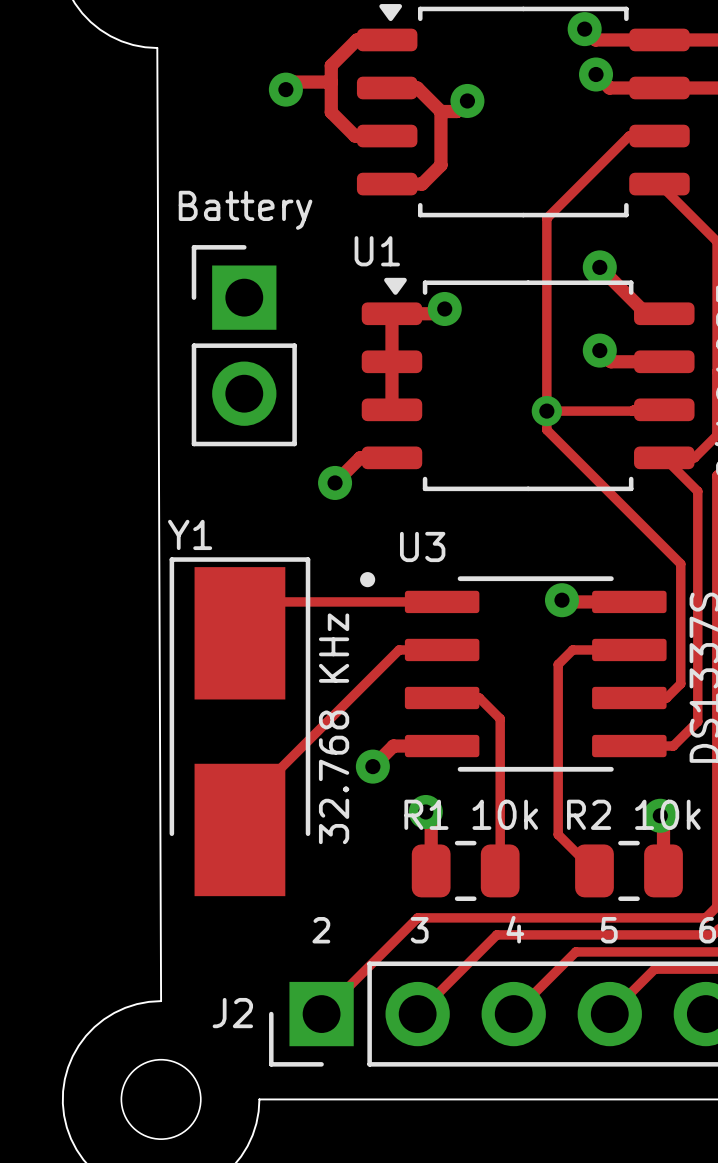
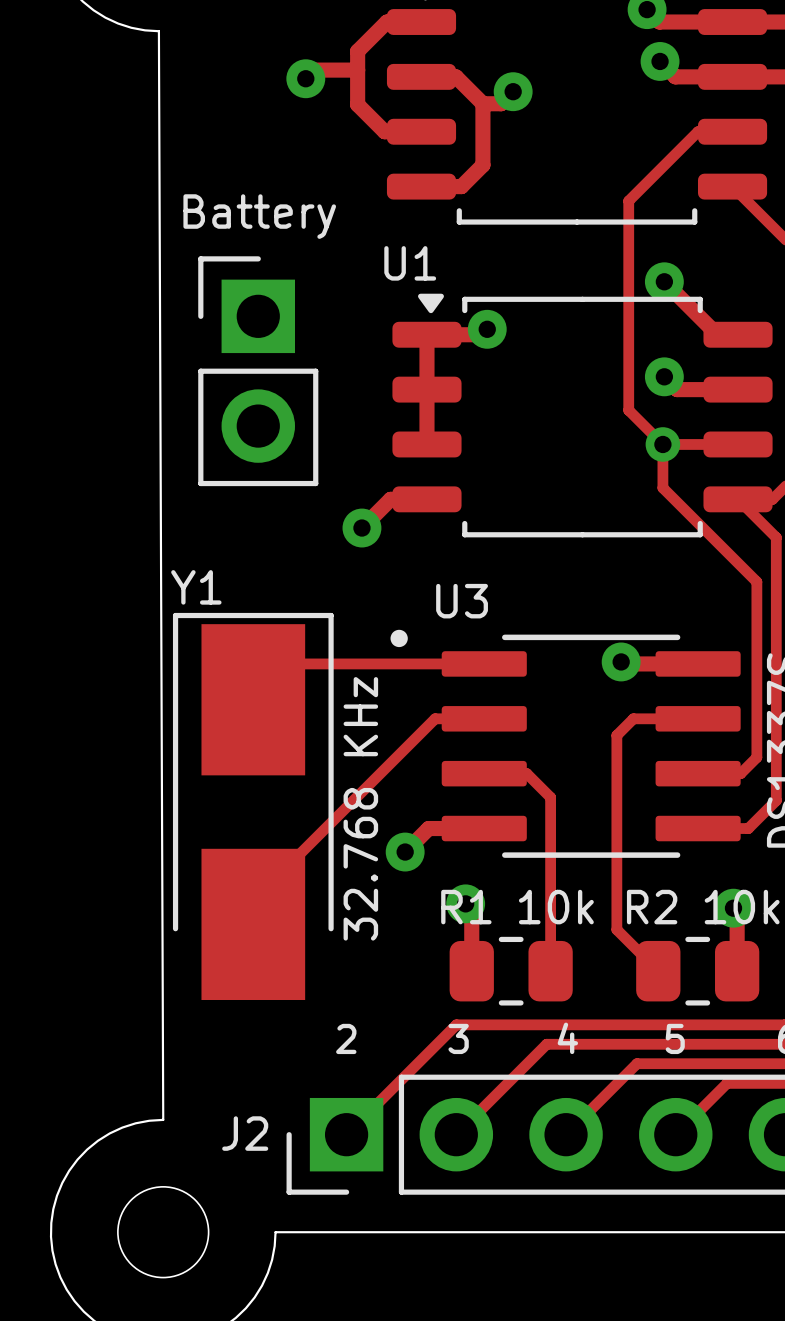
track: (568, 196) (546, 218) (546, 430) (680, 563) -> (628, 200) (628, 410) (662, 444)
track: none -> (662, 444) (662, 487) (756, 581) (756, 620)
track: (634, 409) (546, 411) -> (703, 444) (662, 444)
via position: (546, 411) -> (662, 444)

